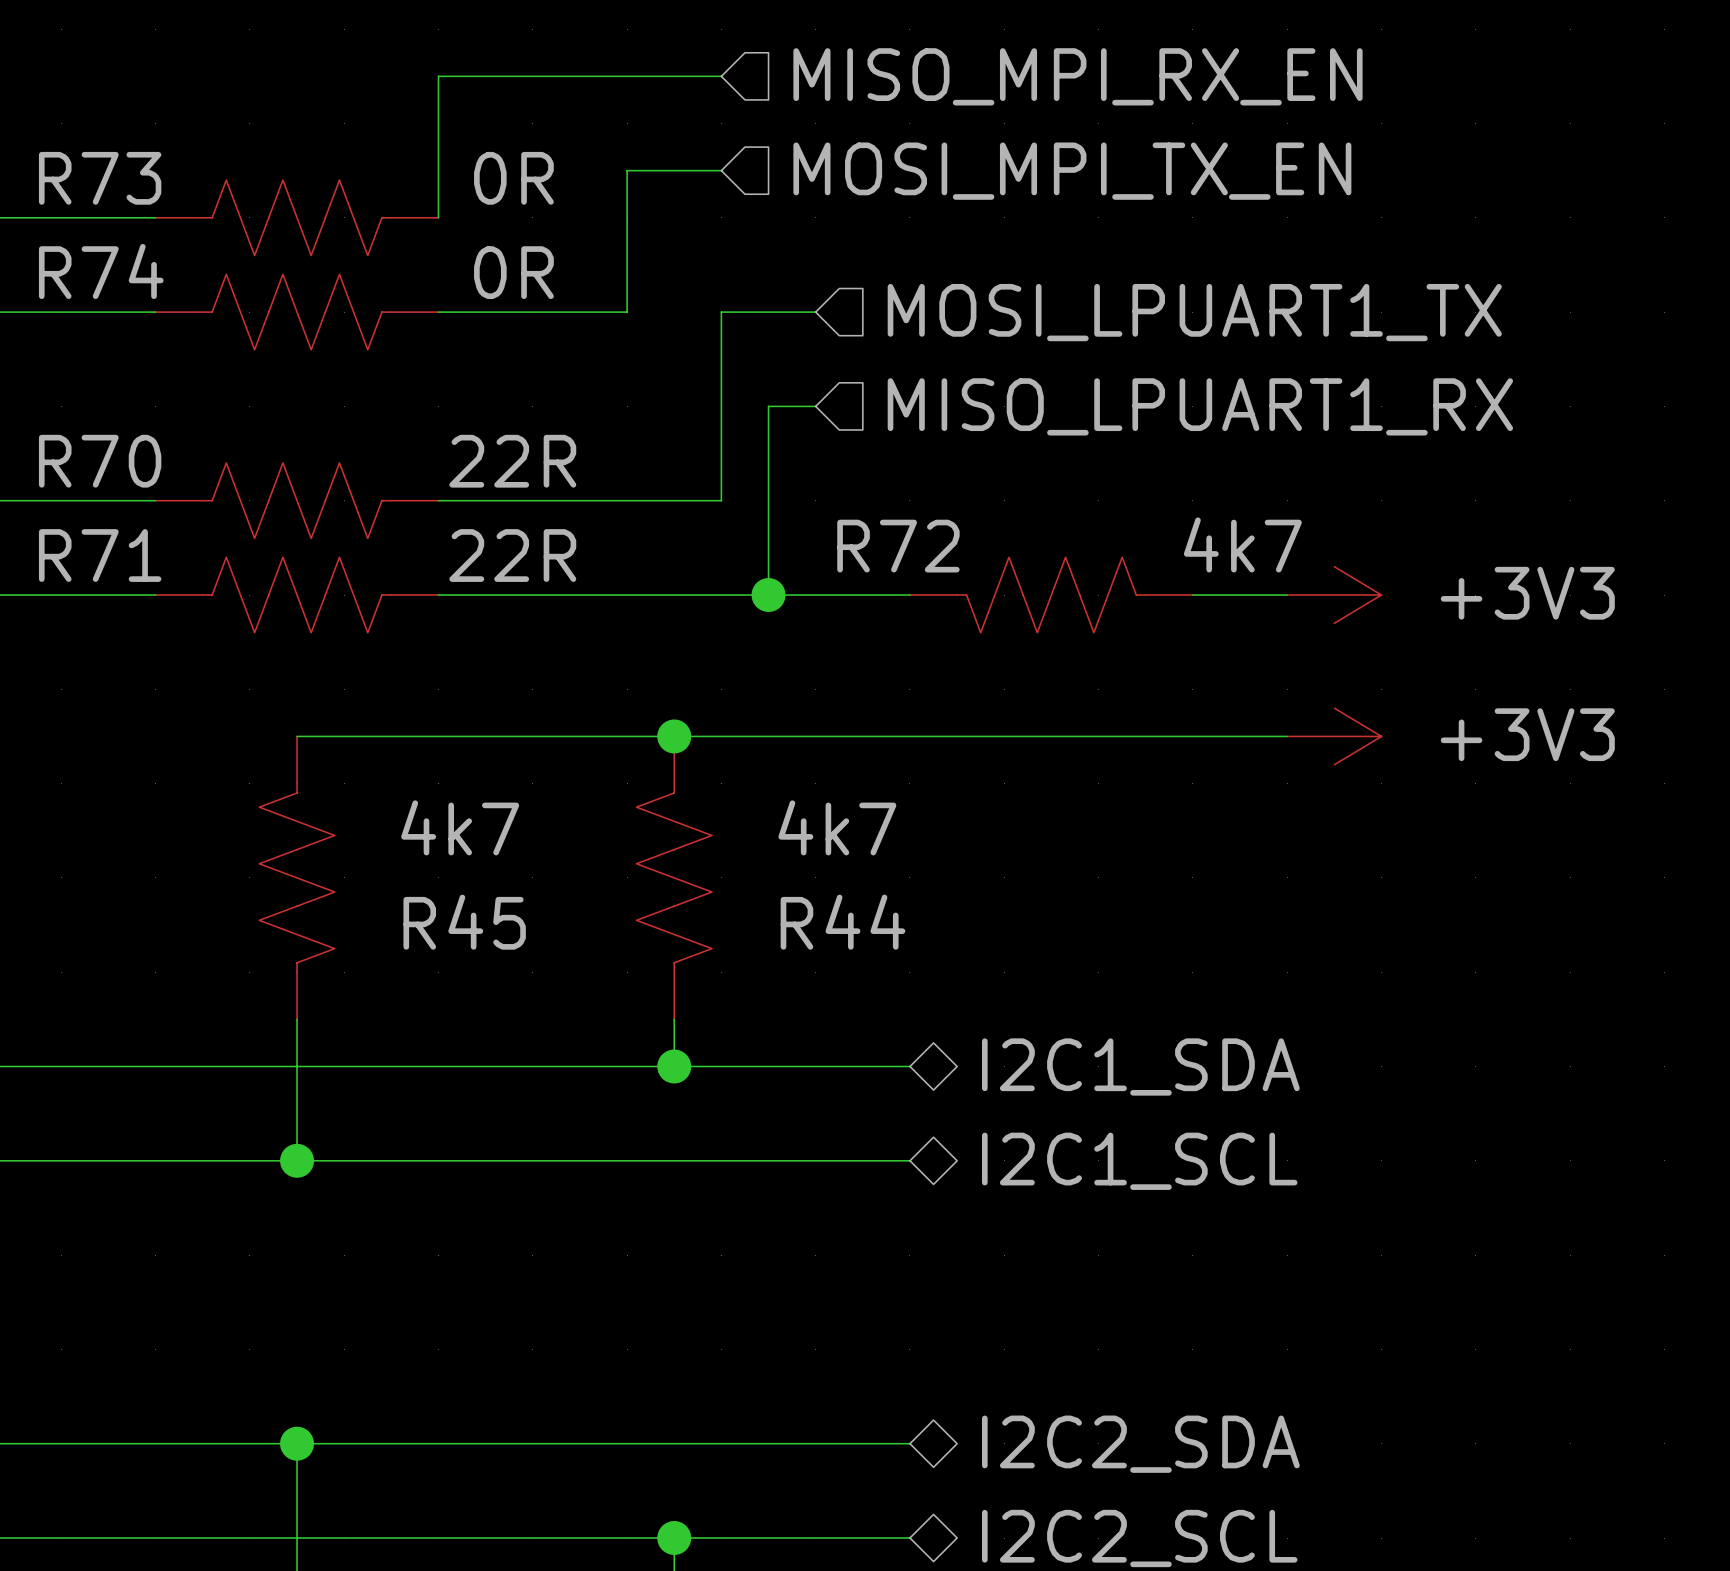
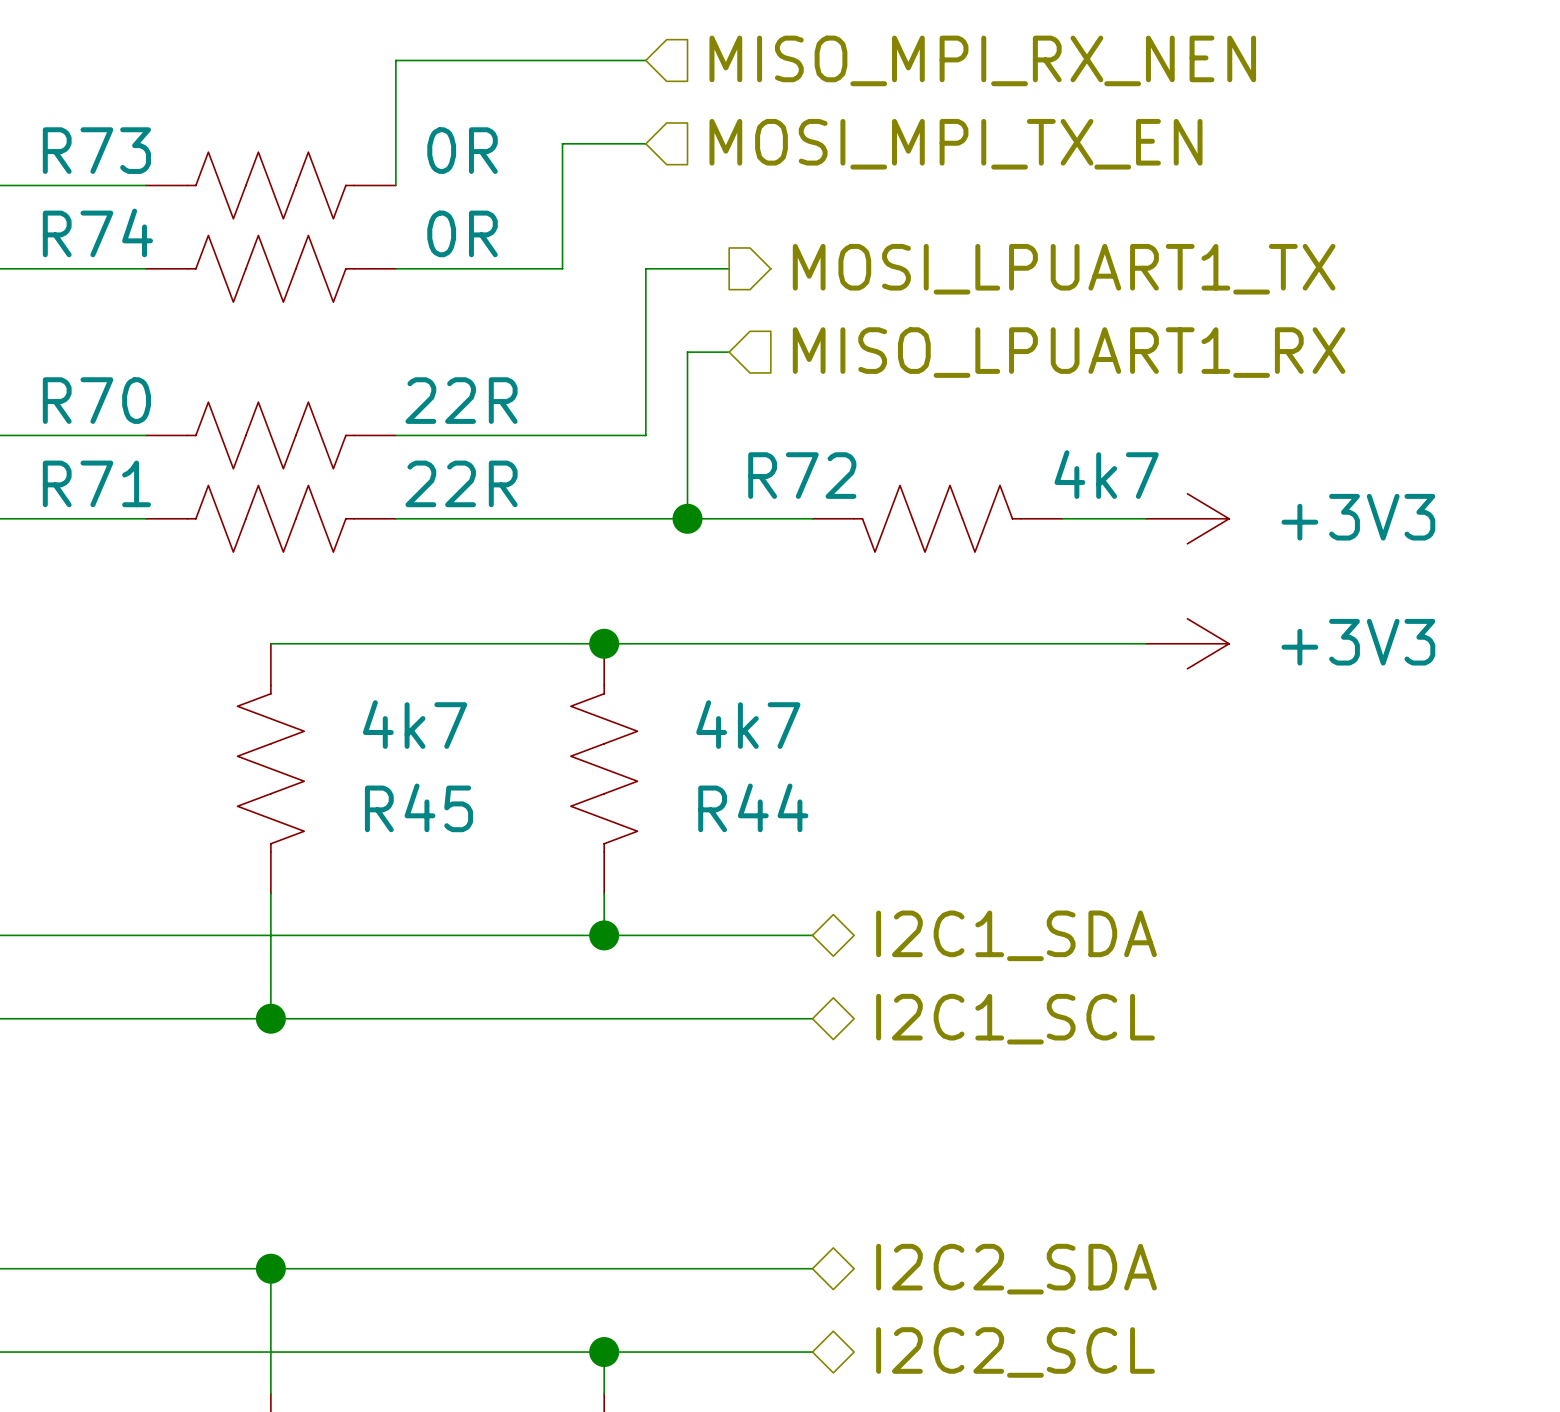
hierarchical label: MISO_MPI_RX_EN (1077, 76) -> MISO_MPI_RX_NEN (982, 60)
hierarchical label shape: input (1194, 312) -> output (1064, 269)

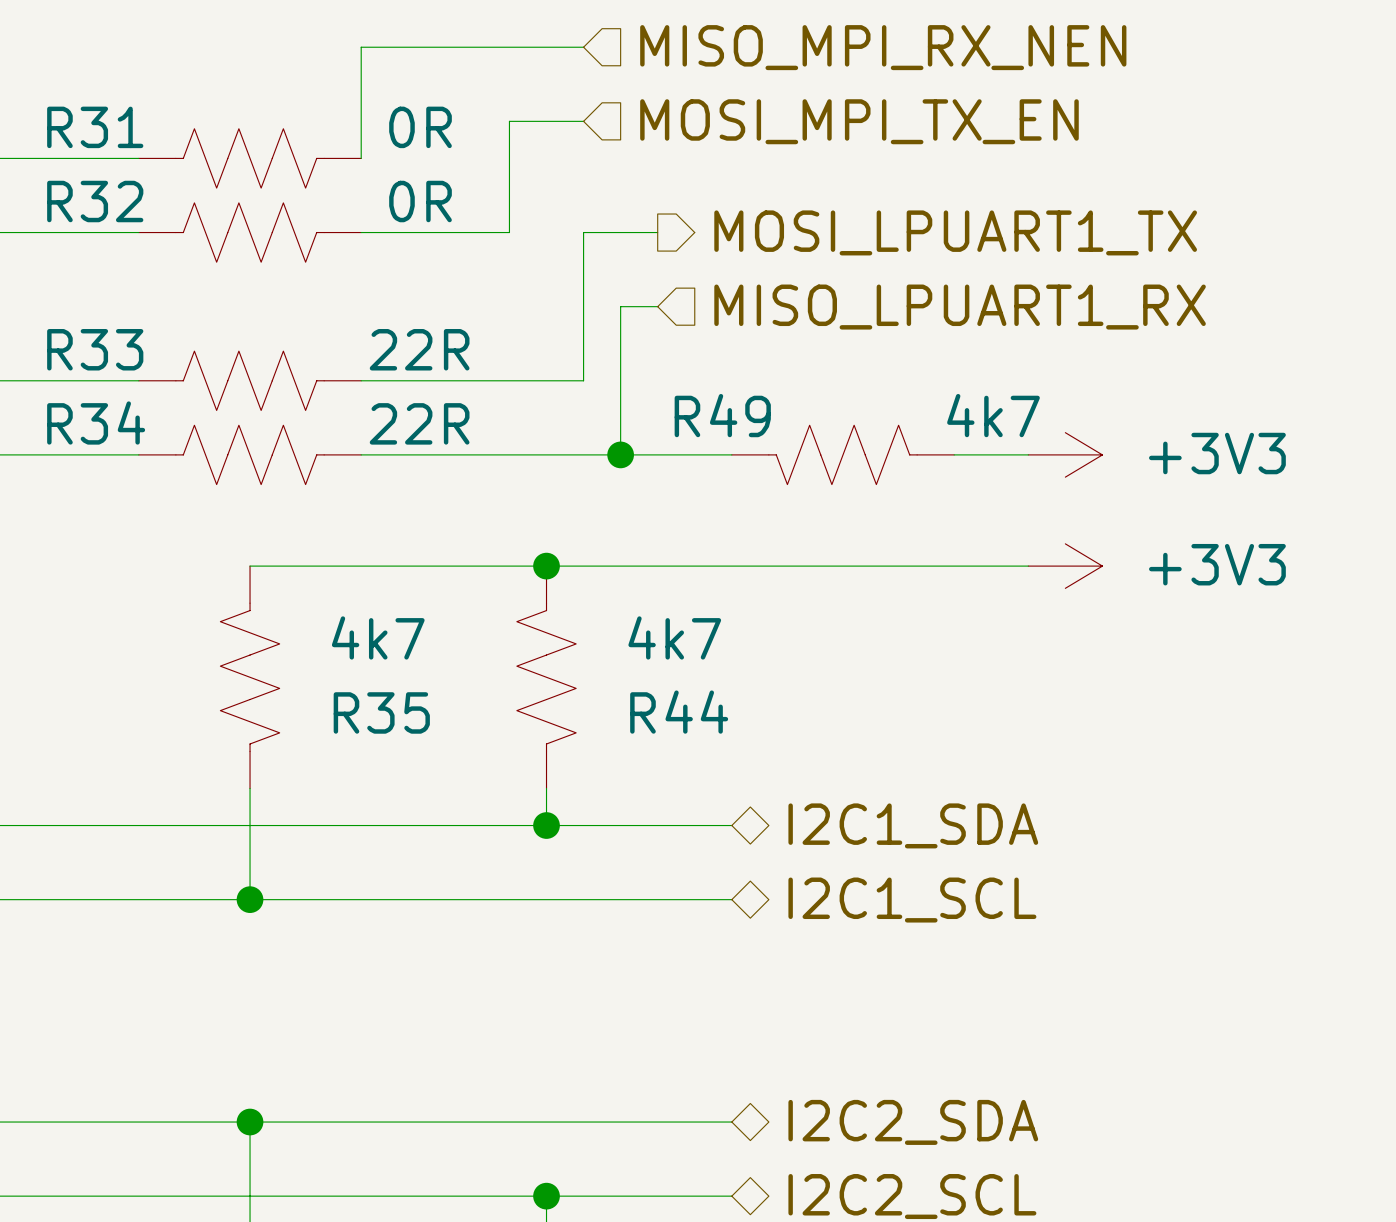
R73 name: R73 (96, 150) -> R31 (95, 127)
R74 name: R74 (97, 232) -> R32 (95, 201)
R70 name: R70 (96, 400) -> R33 (95, 349)
R72 name: R72 (802, 475) -> R49 (722, 415)
R71 name: R71 (96, 483) -> R34 (96, 422)
R45 name: R45 (419, 807) -> R35 (381, 712)

